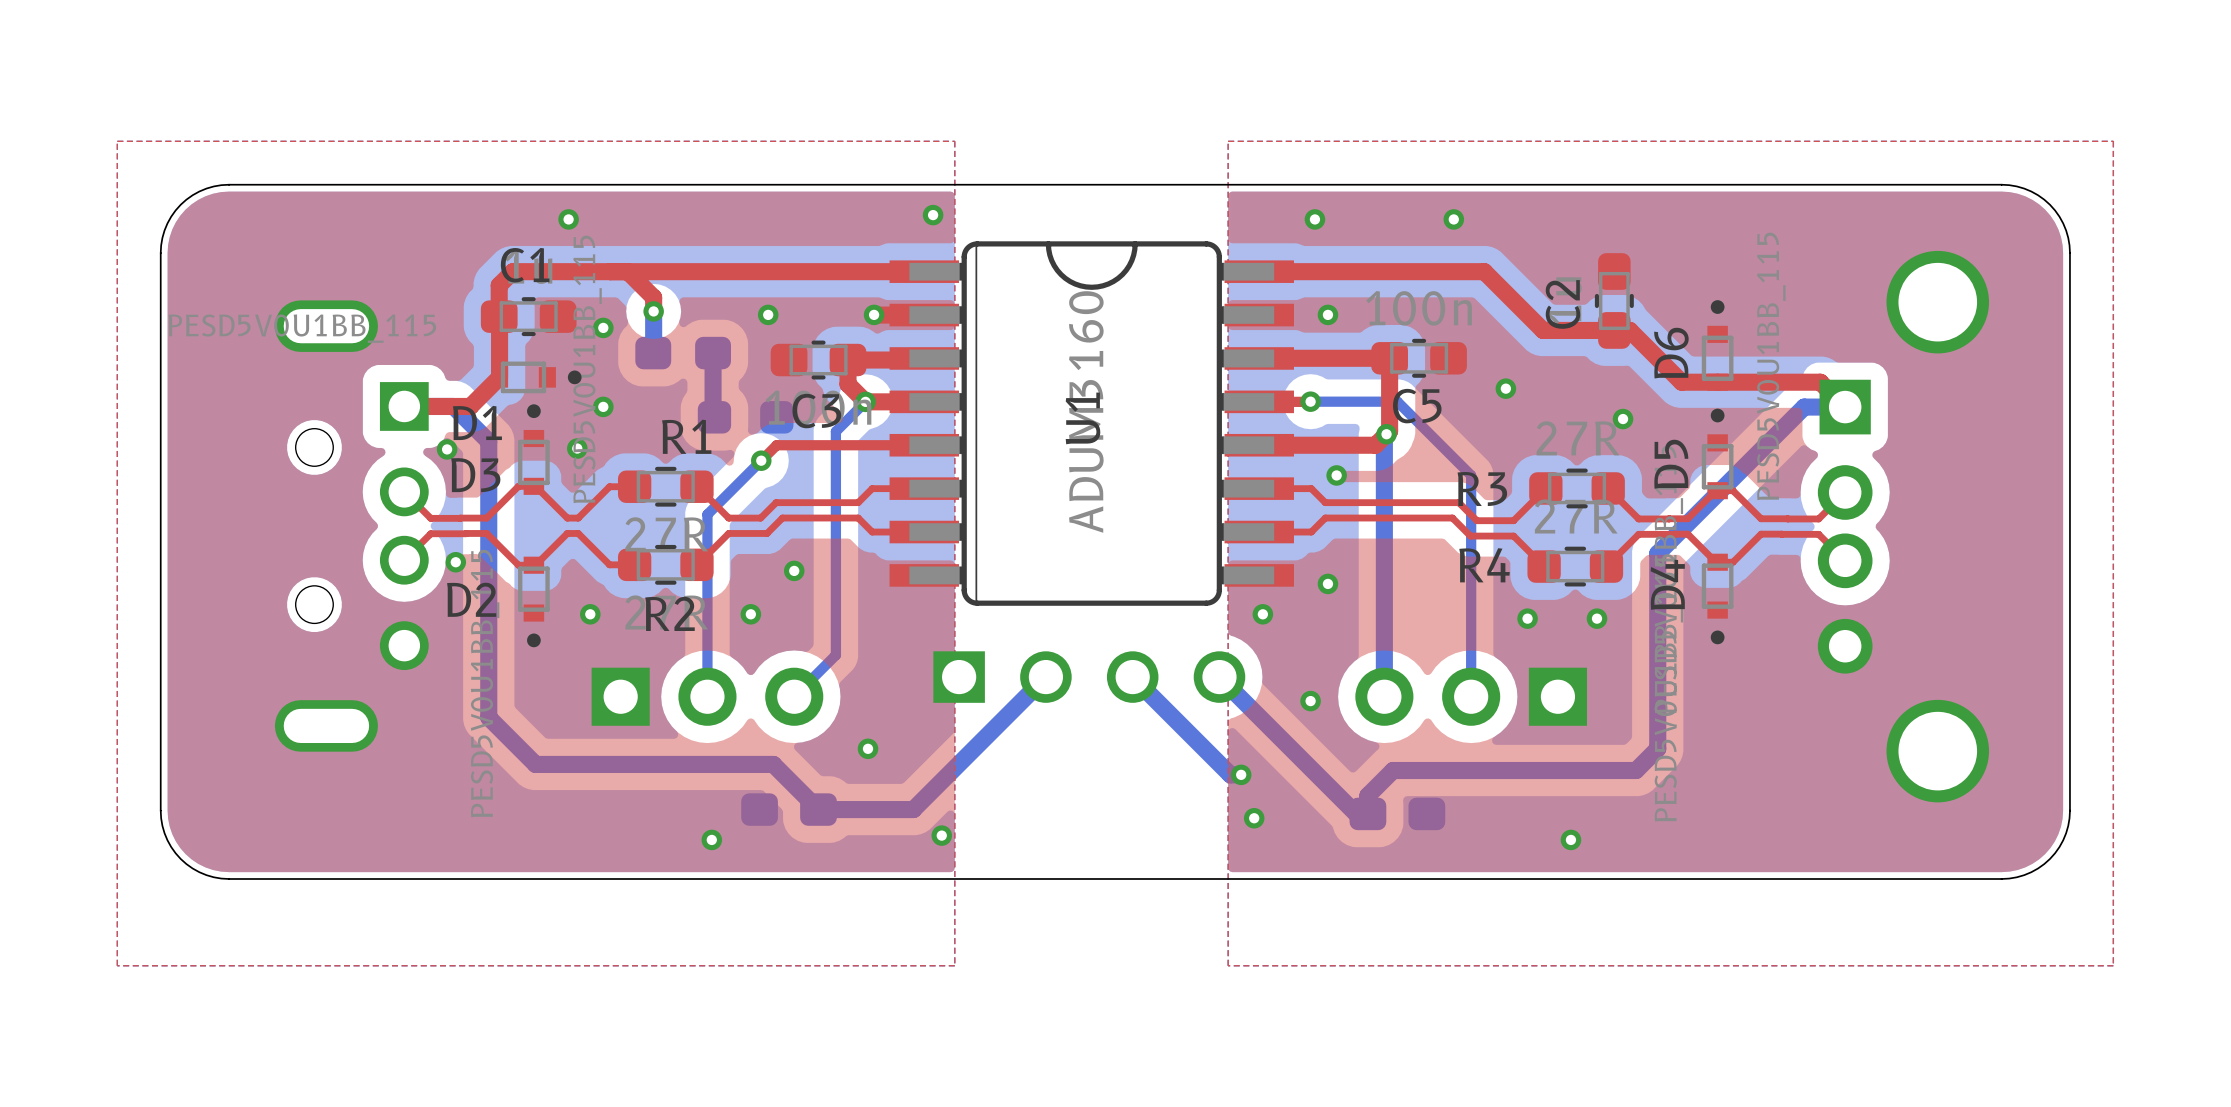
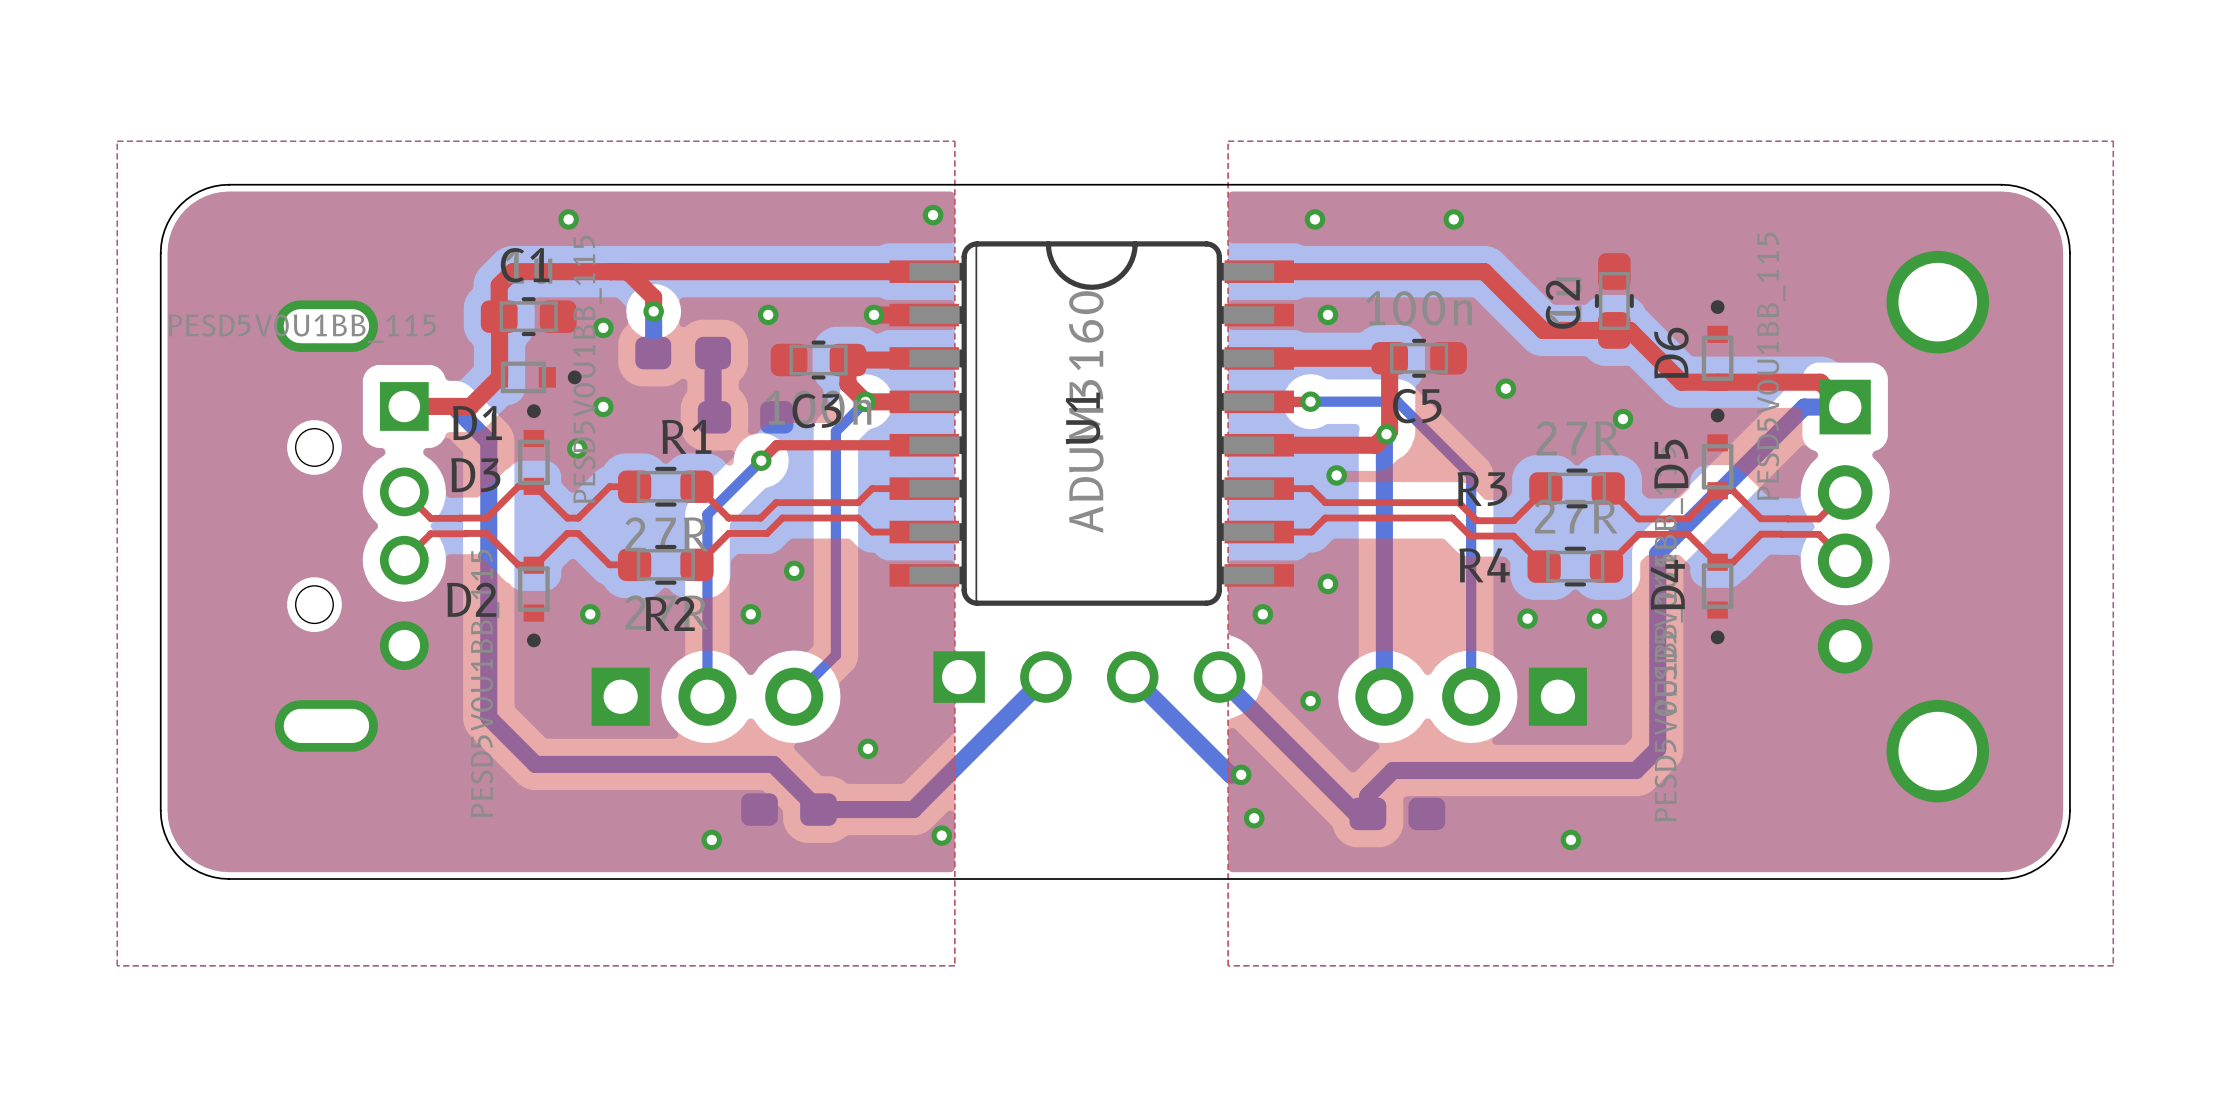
via: (447, 449) -> none
via: (455, 562) -> none

